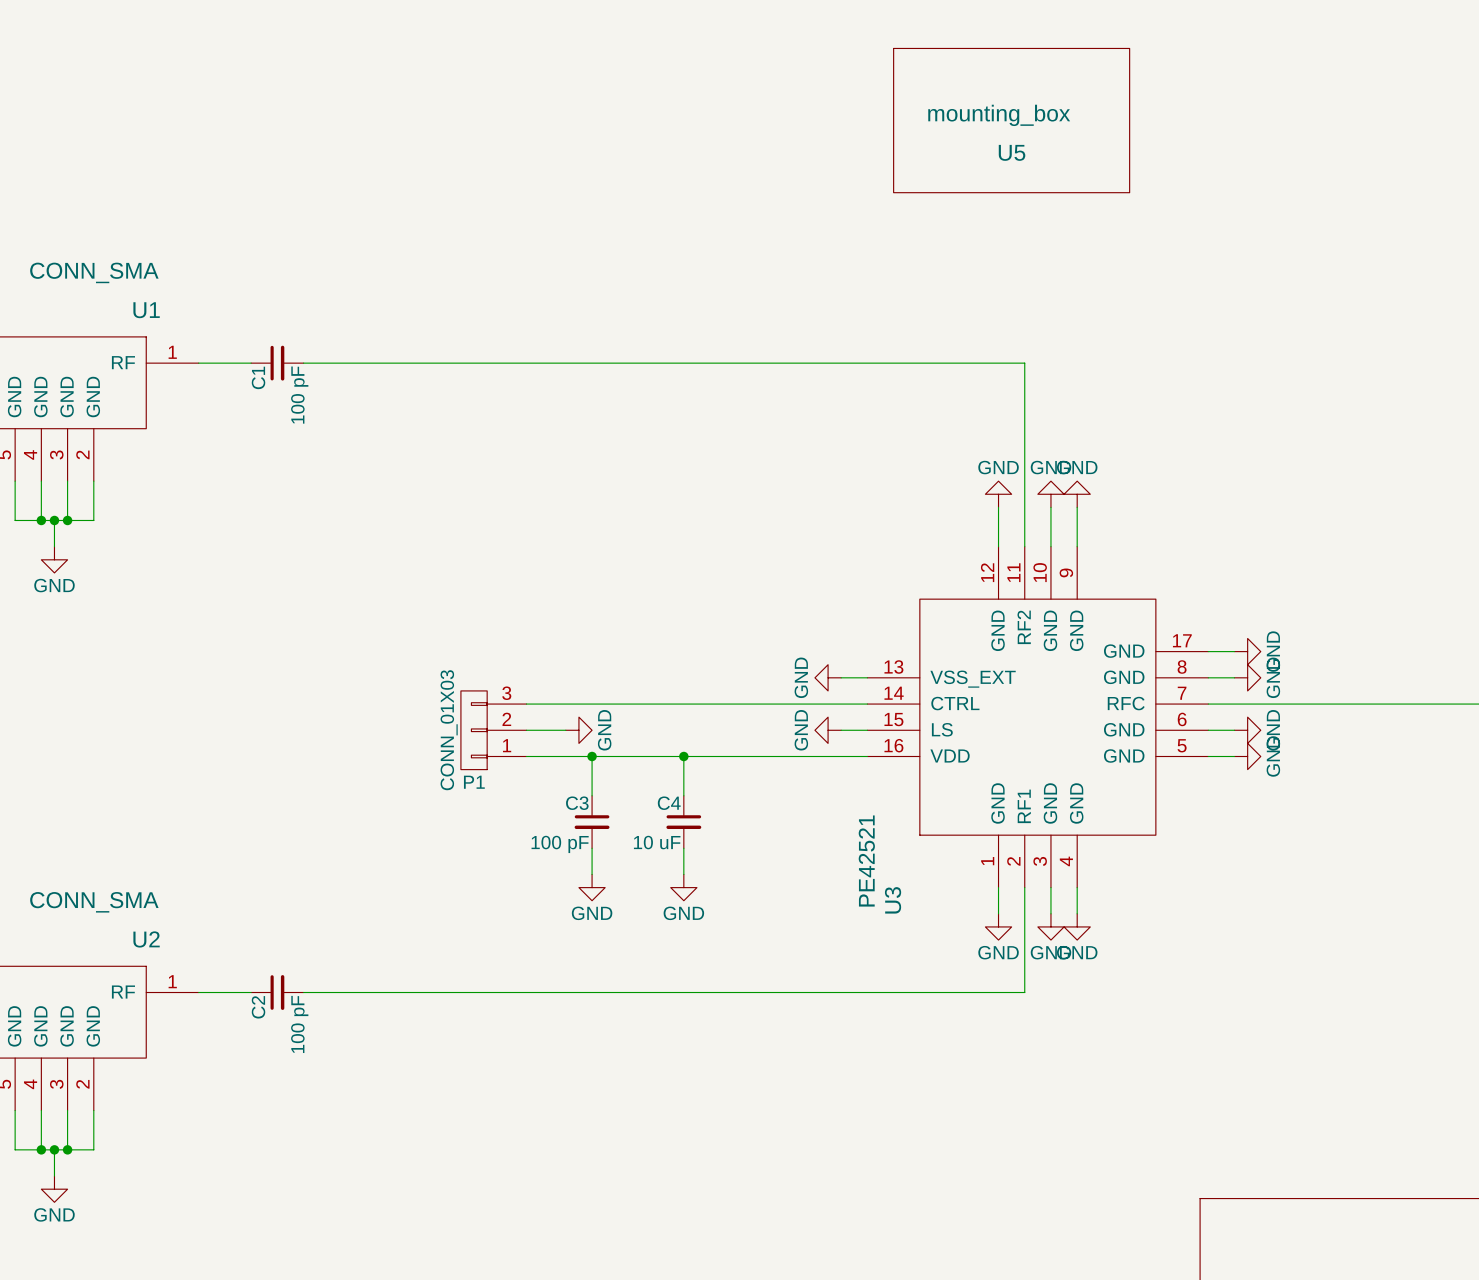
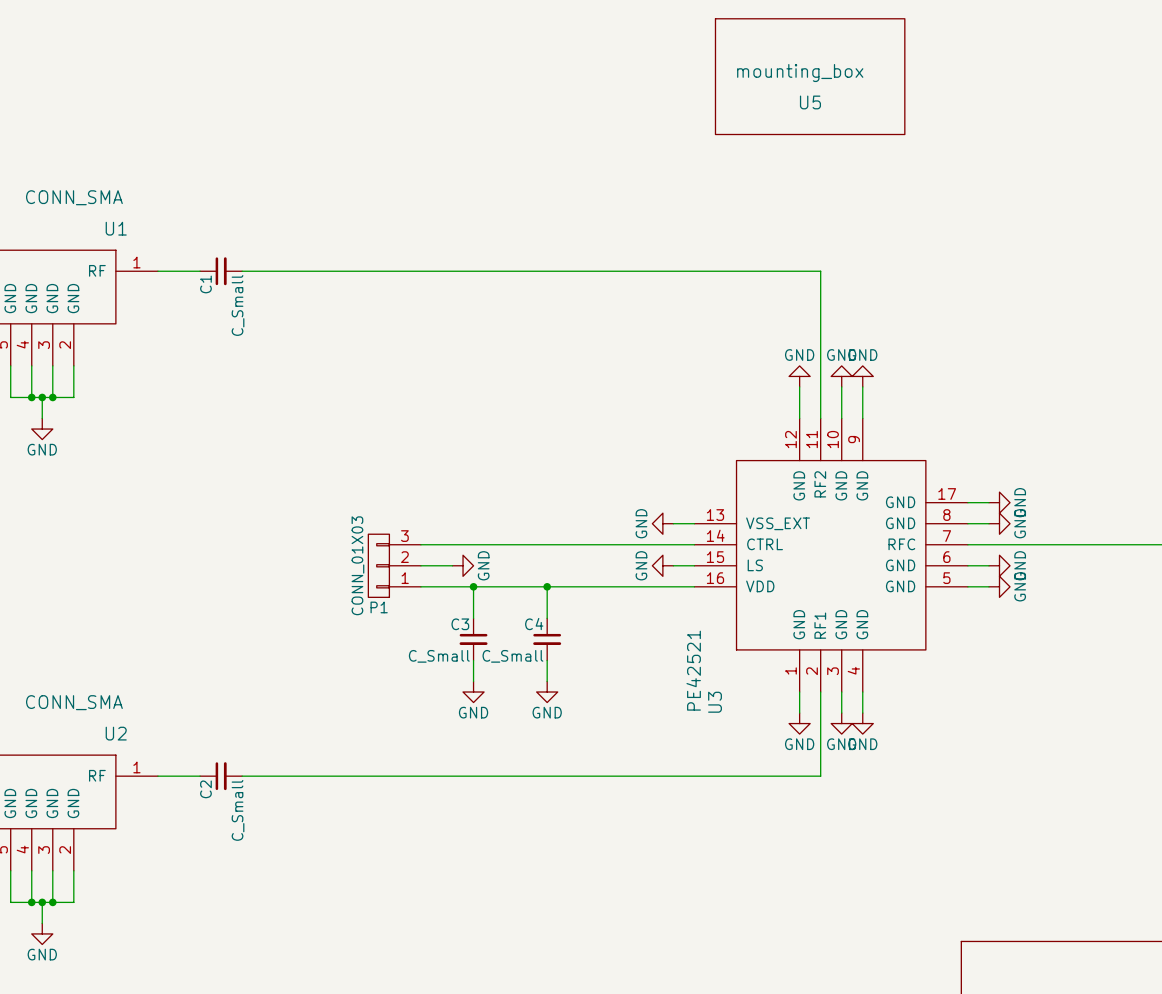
C1 value: 100 pF (299, 395) -> C_Small (238, 305)
C4 value: 10 uF (657, 842) -> C_Small (512, 656)
C3 value: 100 pF (560, 844) -> C_Small (439, 656)
C2 value: 100 pF (299, 1024) -> C_Small (238, 810)

